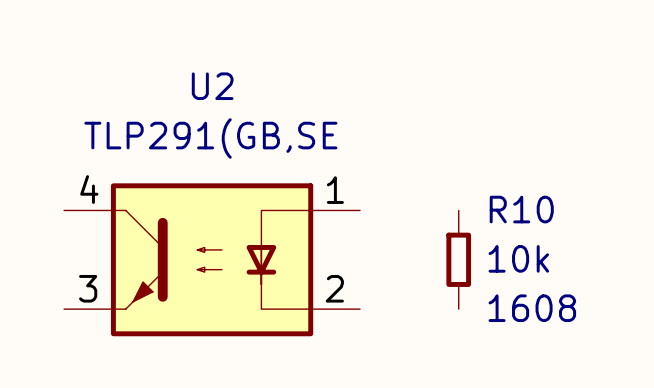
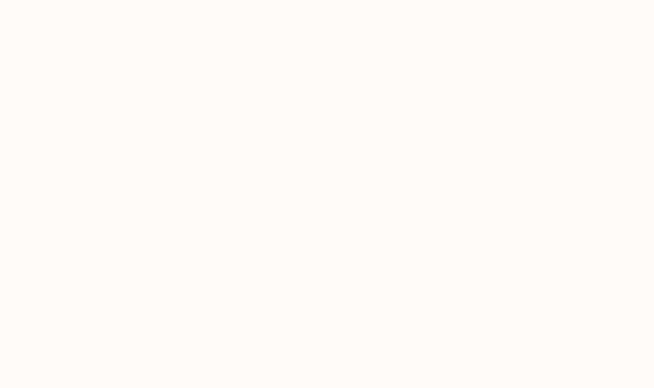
U2: TLP291(GB,SE (212, 259) -> none
R10: 10k (458, 259) -> none

